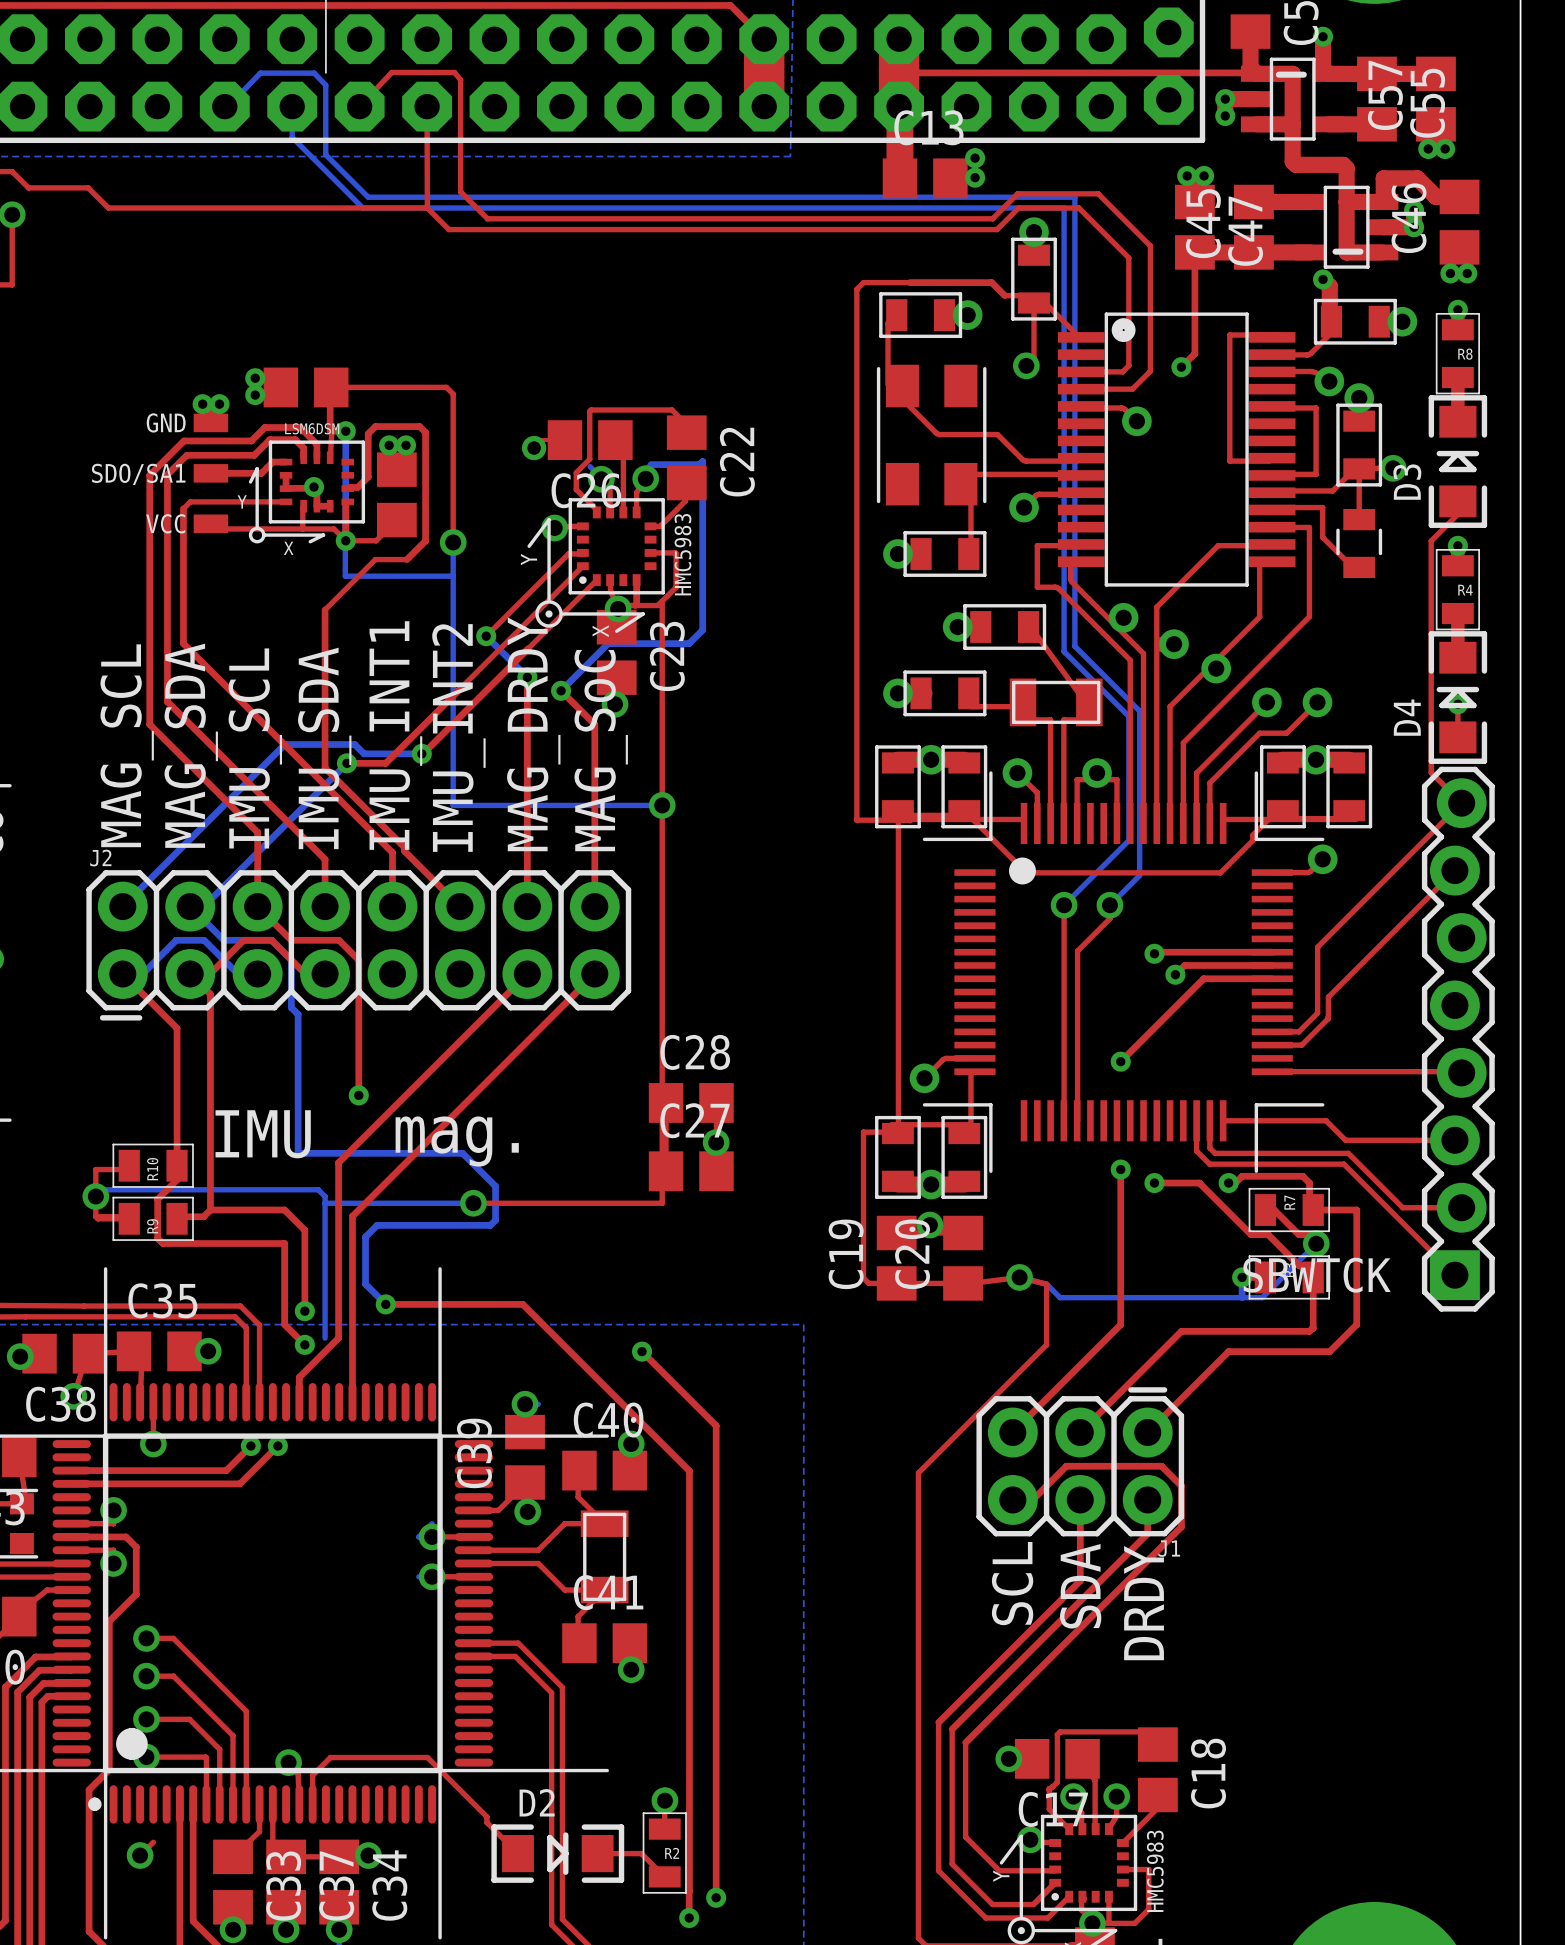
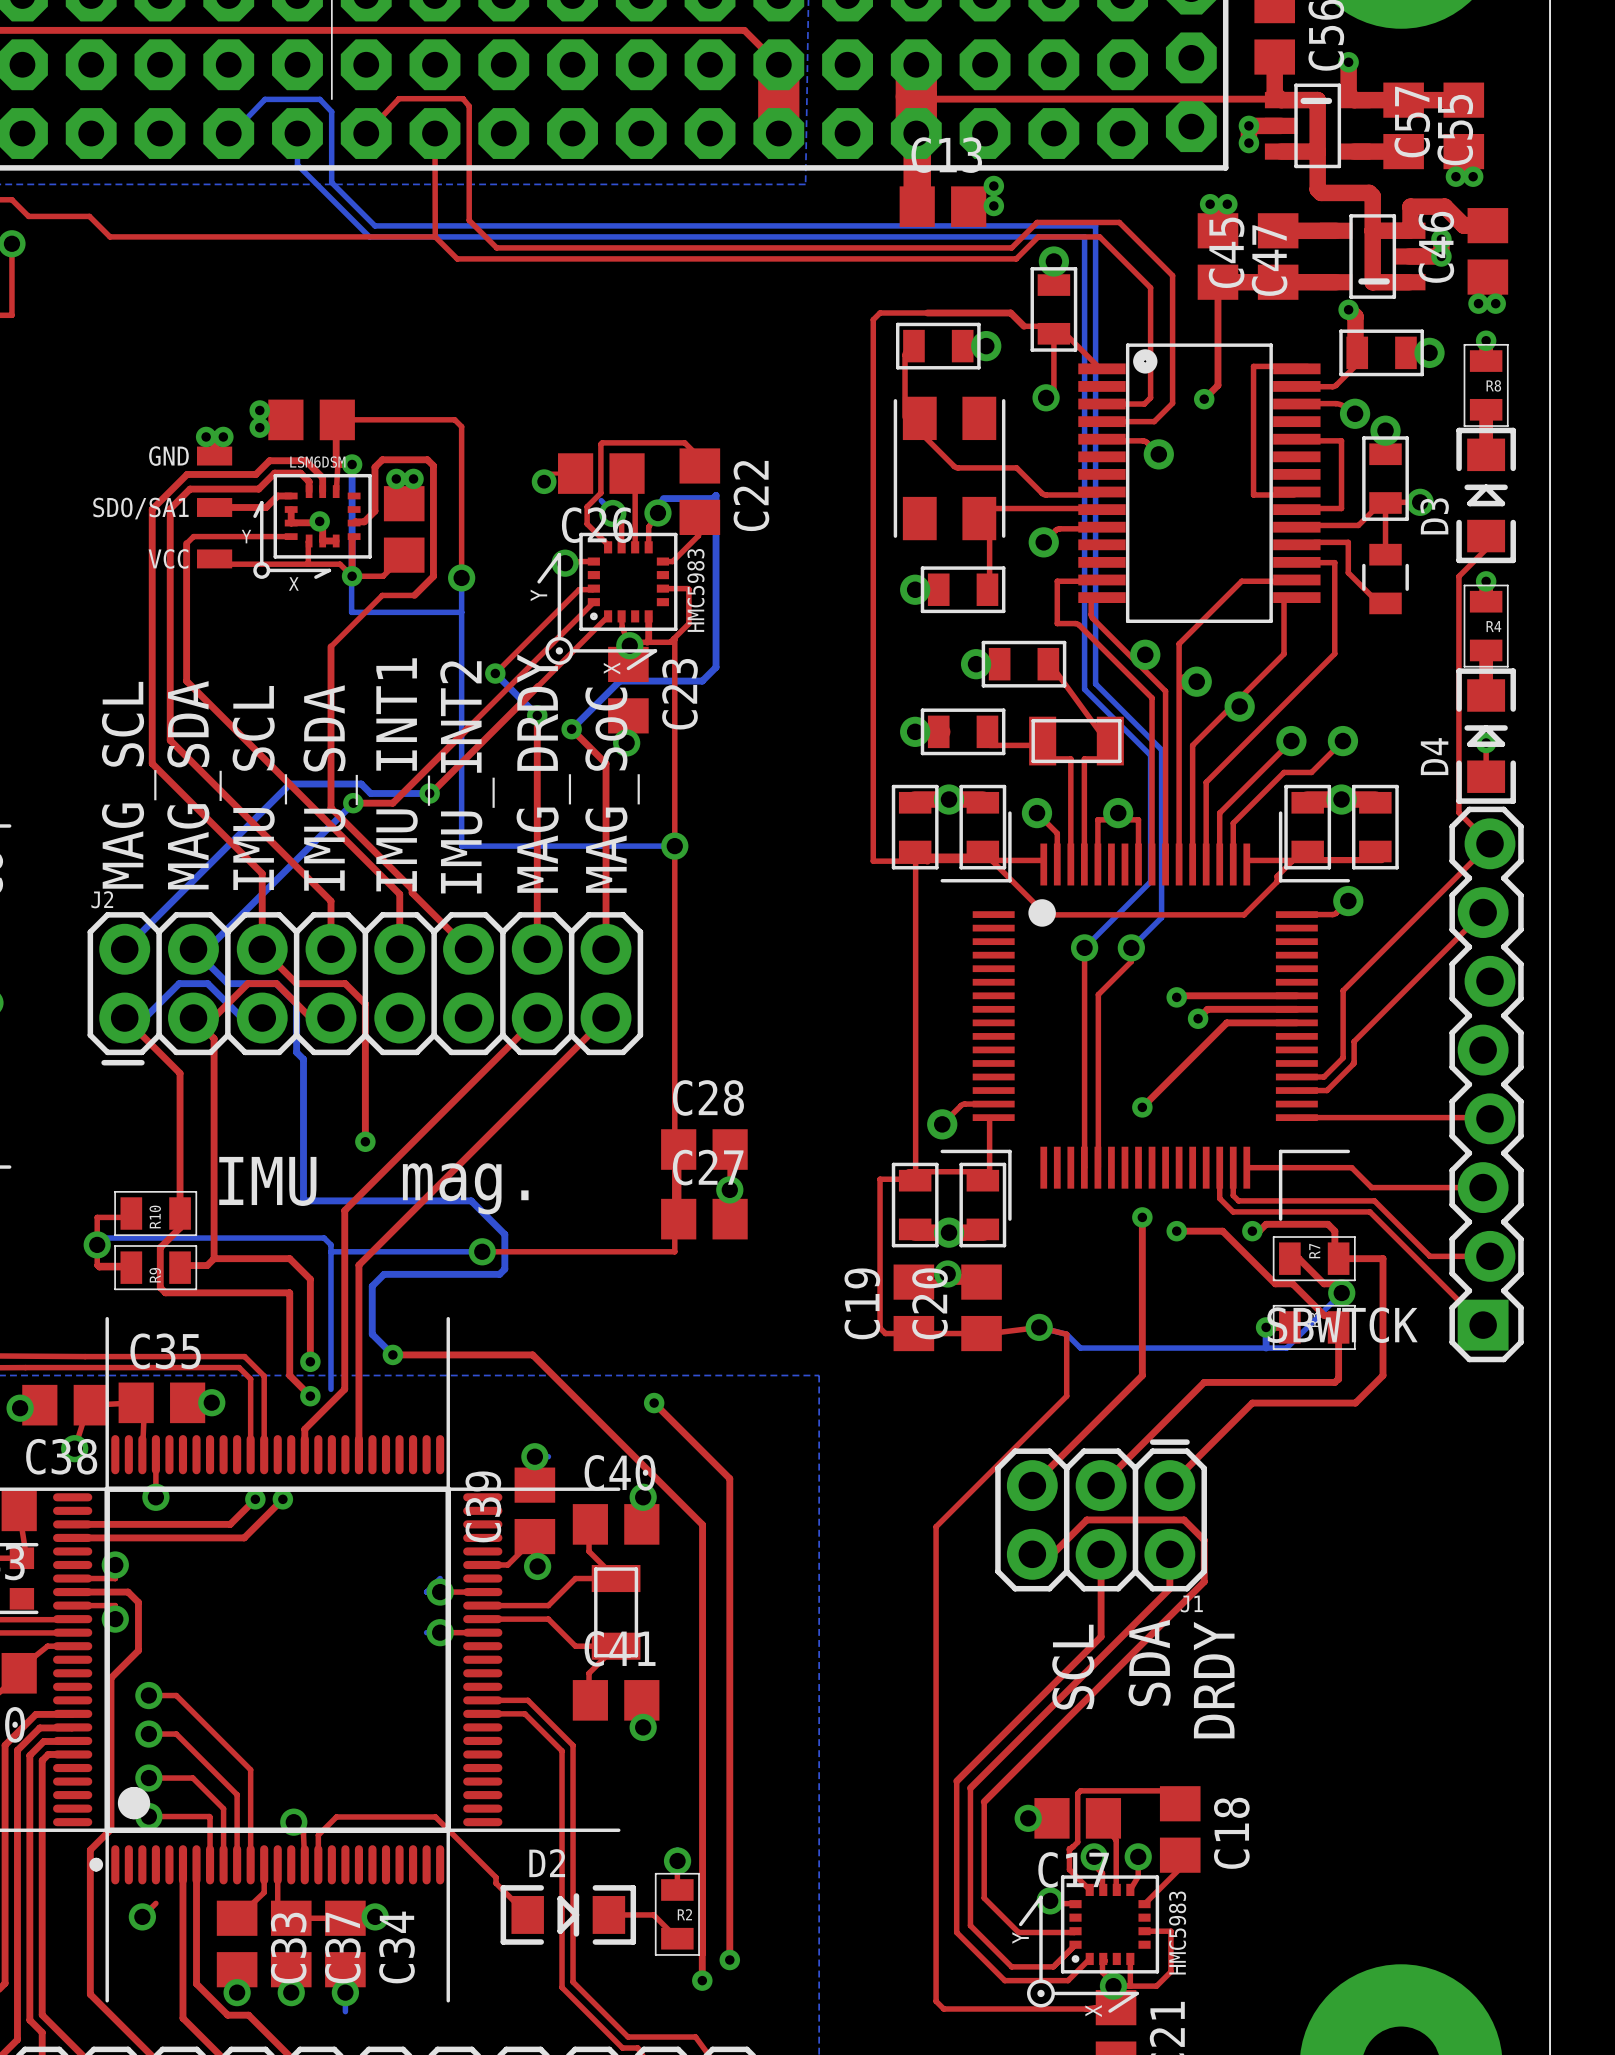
text position: SCL (1012, 1583) -> SCL (1073, 1667)
text: SDA (1080, 1586) -> none
text: DRDY (1144, 1603) -> SDA (1149, 1662)
text: none -> DRDY (1214, 1680)

